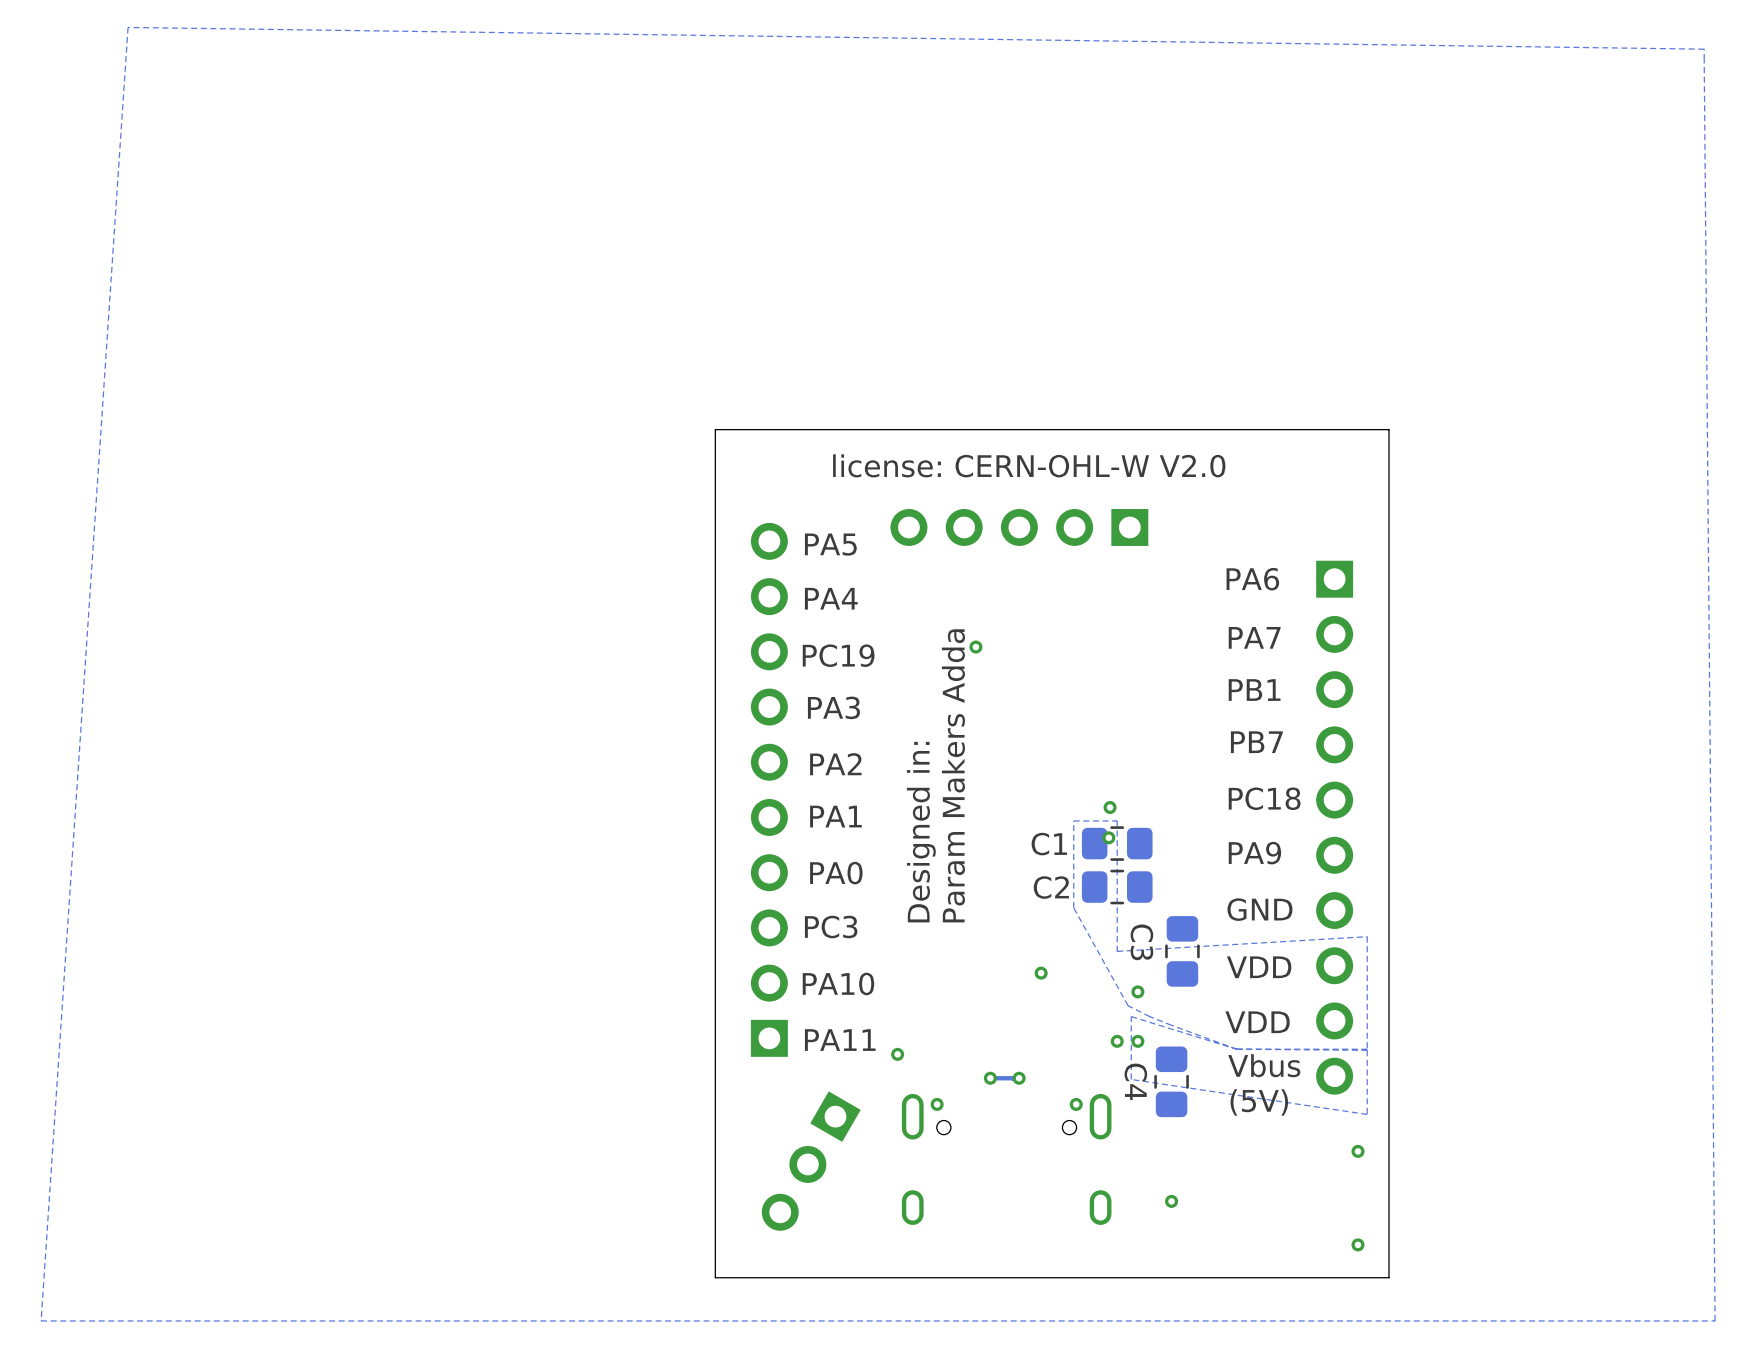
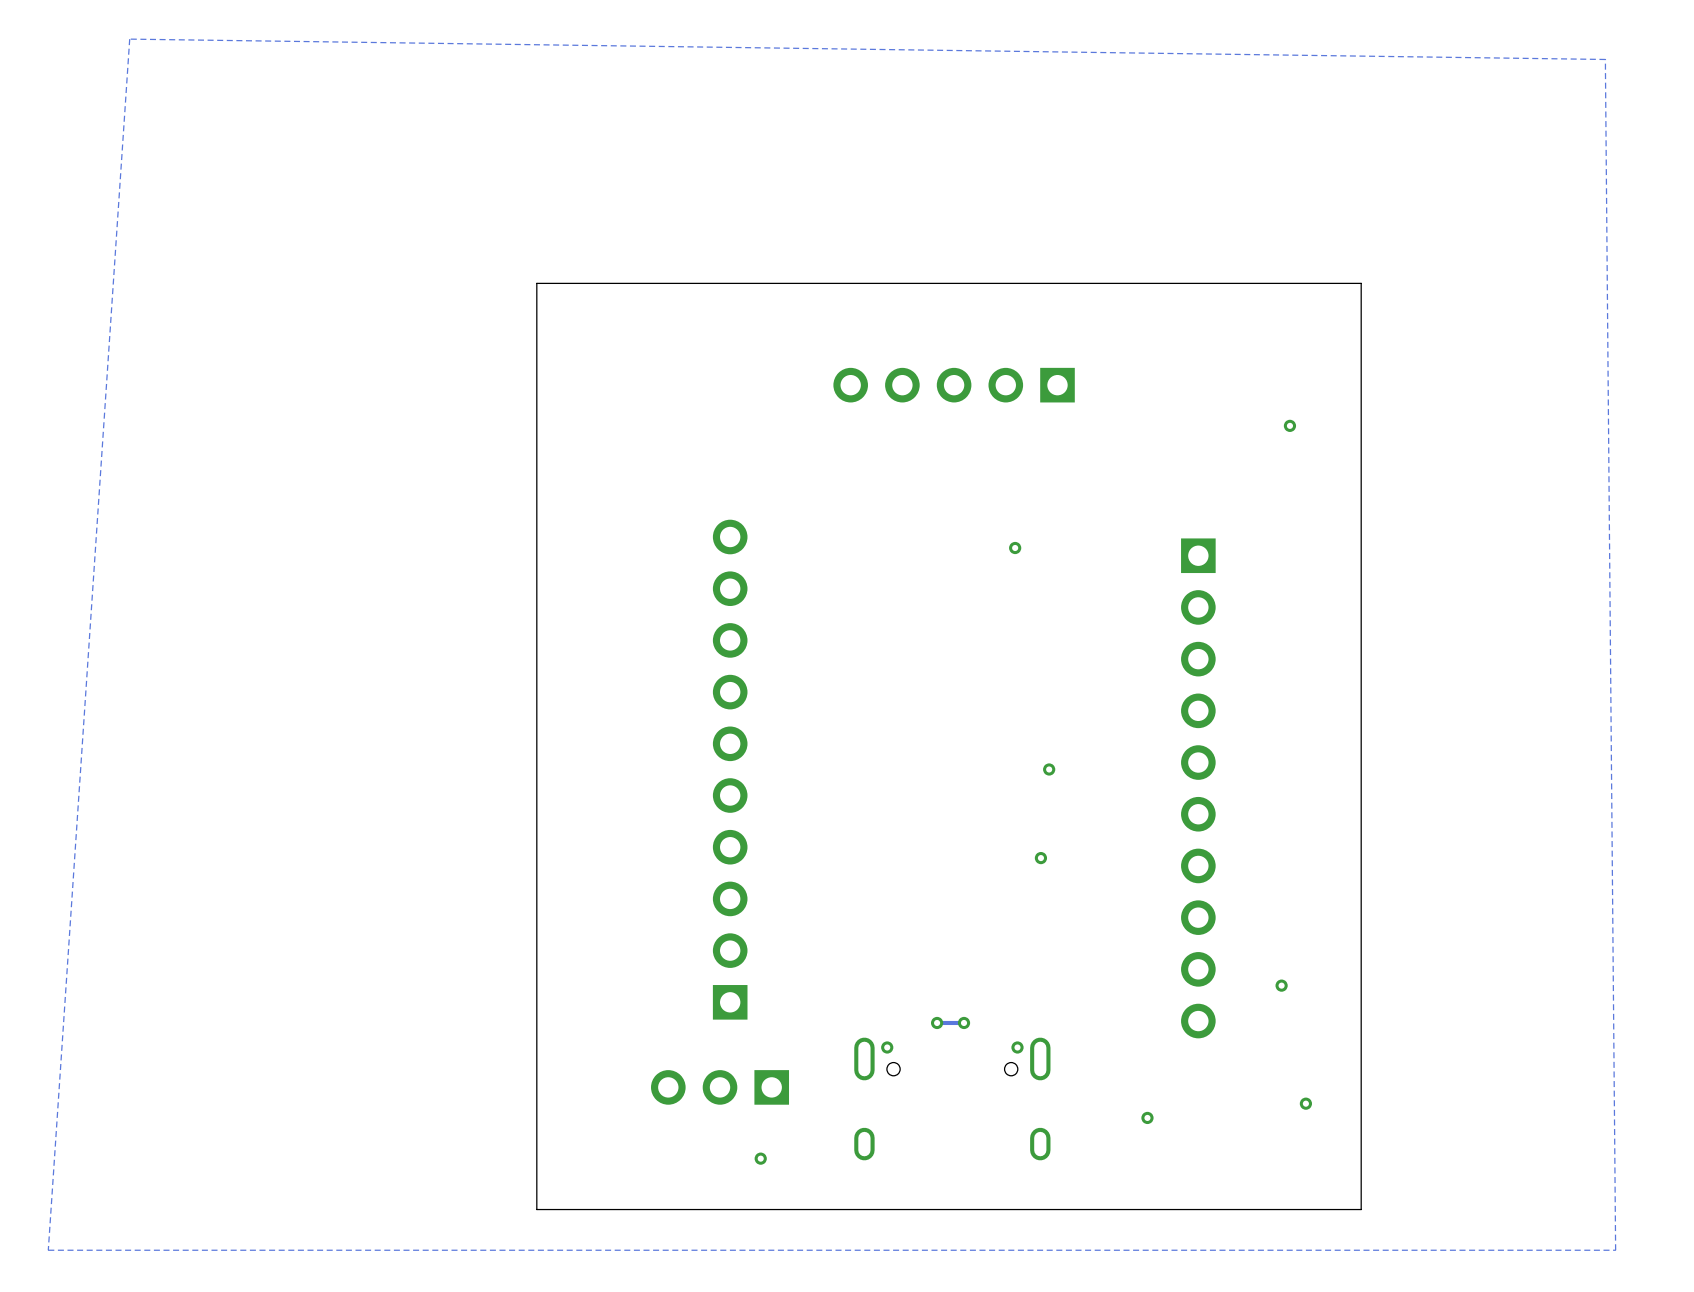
board edge: (1388, 429) (715, 429) (715, 1277) (1388, 1277) (1388, 429) -> (1361, 283) (1361, 1209) (536, 1209) (536, 283) (1361, 283)
via: none -> (1289, 425)
text: license: CERN-OHL-W V2.0 (1029, 465) -> none
part position: (1019, 527) -> (954, 385)
text: PA5 (830, 544) -> none
text: PA6 (1252, 579) -> none
text: PA4 (831, 598) -> none
text: PA7 (1254, 637) -> none
via position: (975, 647) -> (1015, 548)
text: PC19 (838, 655) -> none
text: PB1 (1254, 690) -> none
text: PA3 (833, 707) -> none
text: PB7 (1256, 742) -> none
text: PA2 (835, 764) -> none
text: Param Makers Adda (953, 775) -> none
part position: (769, 789) -> (730, 769)
text: PC18 (1264, 798) -> none
text: PA1 (835, 816) -> none
part position: (1334, 827) -> (1198, 788)
text: Designed in: (921, 832) -> none
via: (1108, 837) -> none
C1: (1117, 843) -> none
text: PA9 (1254, 853) -> none
text: PA0 (836, 873) -> none
C2: (1117, 887) -> none
via: none -> (1040, 858)
text: GND (1259, 909) -> none
text: PC3 (831, 927) -> none
C3: (1182, 951) -> none
text: VDD (1259, 967) -> none
via: (1041, 973) -> none
text: PA10 (838, 983) -> none
via: (1137, 991) -> none
text: VDD (1257, 1022) -> none
via: none -> (1281, 985)
text: PA11 (840, 1040) -> none
via: (1117, 1041) -> none
via: (1137, 1041) -> none
zone outline: (1236, 1049) (1367, 1050) (1367, 1114) (1131, 1079) (1131, 1016) (1236, 1049) -> none
zone outline: (1236, 1049) (1367, 1049) (1367, 936) (1117, 951) (1117, 820) (1073, 820) (1073, 907) (1128, 1005) (1171, 1025) (1236, 1049) -> none
via: (897, 1054) -> none
text: Vbus (1264, 1065) -> none
C4: (1171, 1081) -> none
text: (5V) (1259, 1102) -> none
part: none -> (720, 1087)
via position: (1357, 1151) -> (1305, 1103)
part: (811, 1161) -> none
via position: (1171, 1201) -> (1147, 1117)
via: none -> (760, 1158)
via: (1357, 1244) -> none

